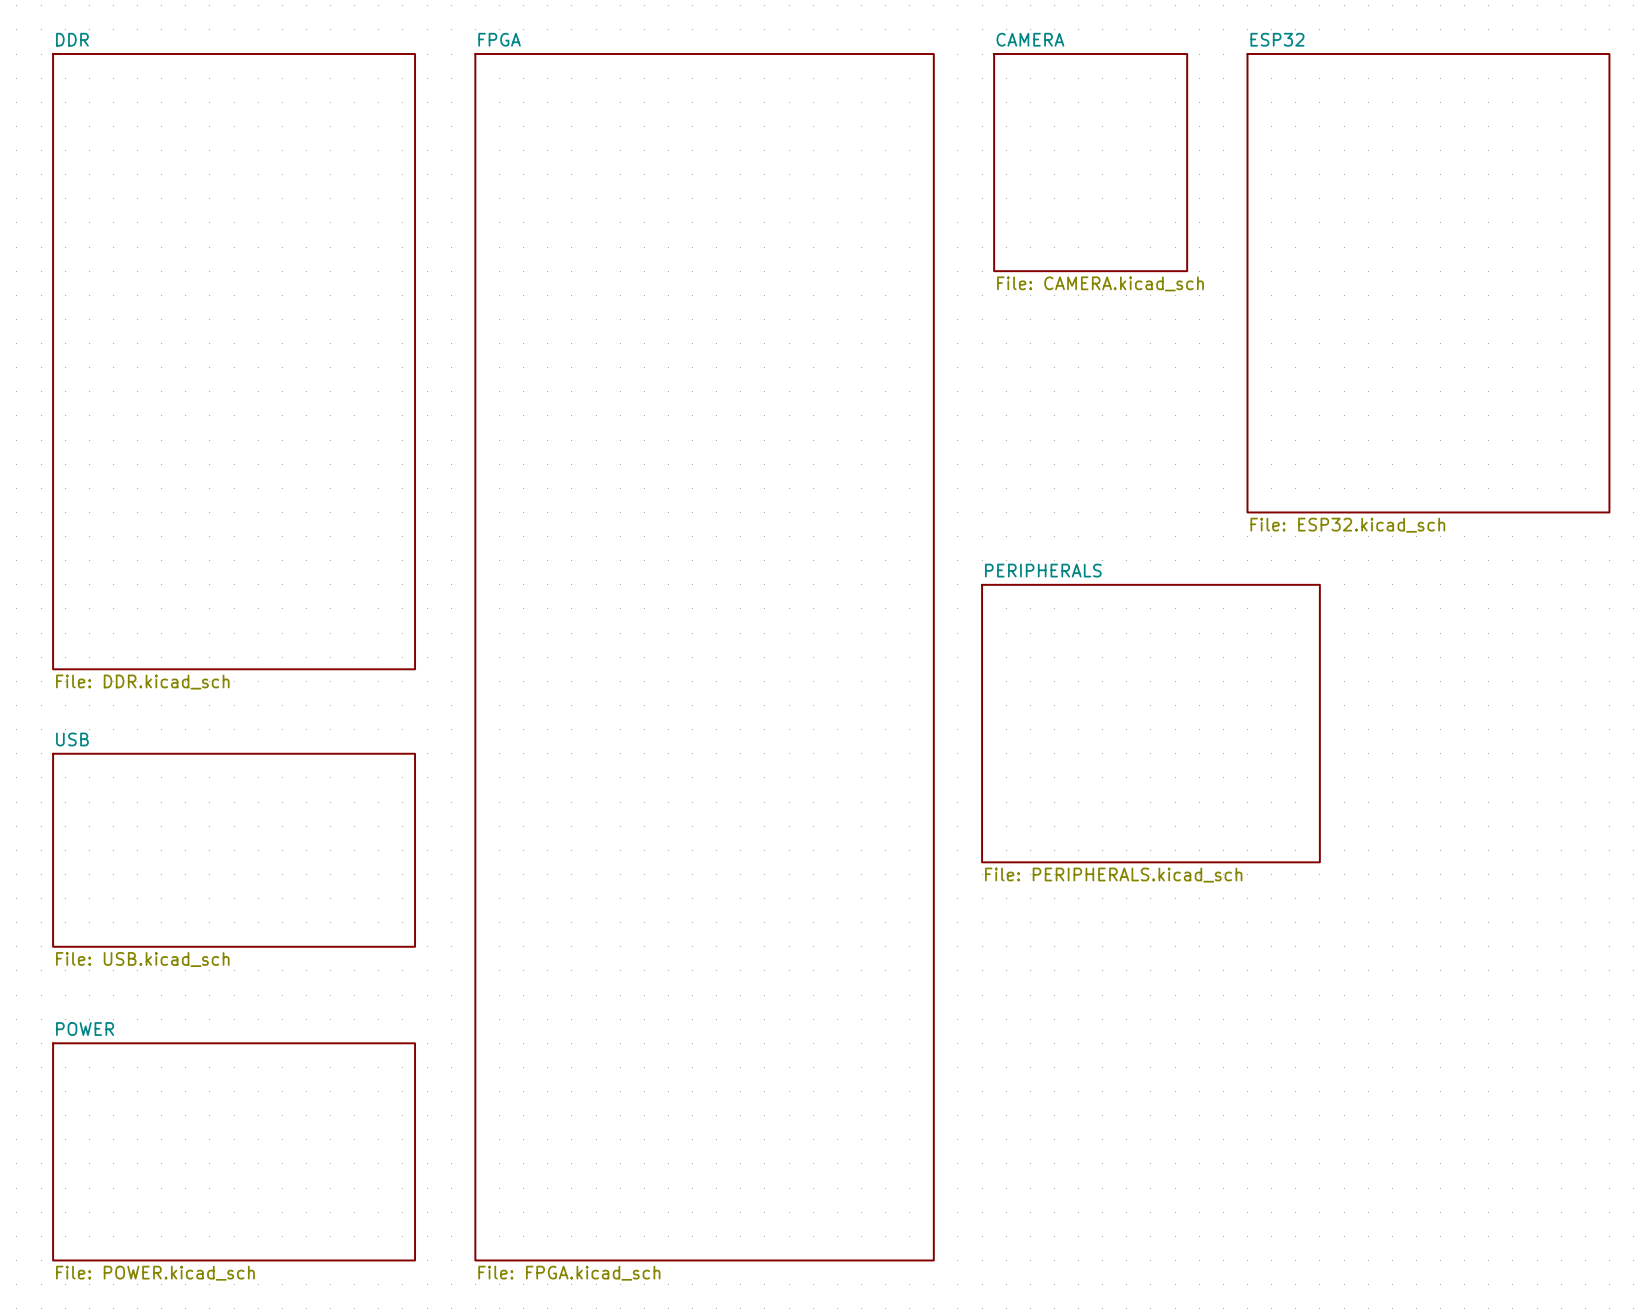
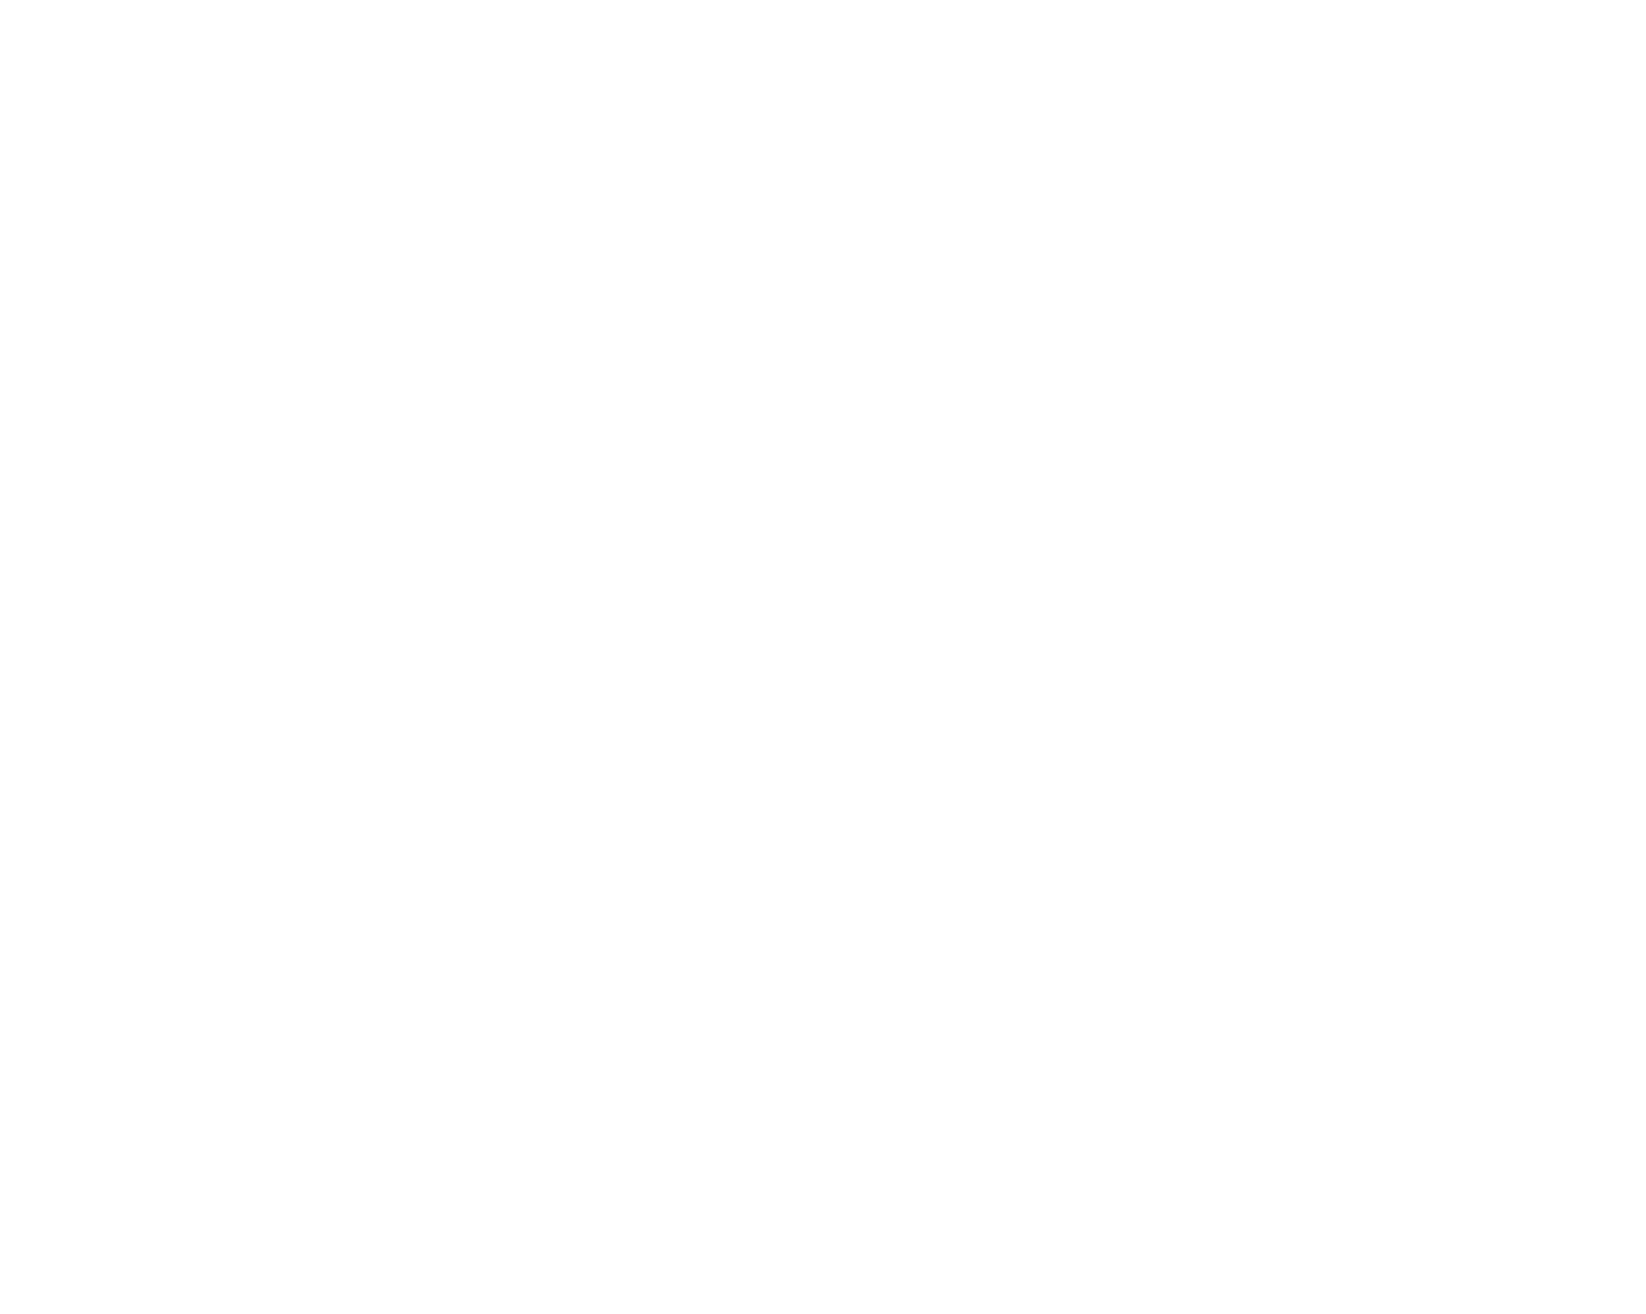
sheet CAMERA: File: CAMERA.kicad_sch (1090, 162) -> none
sheet ESP32: File: ESP32.kicad_sch (1428, 283) -> none
sheet DDR: File: DDR.kicad_sch (234, 361) -> none
sheet FPGA: File: FPGA.kicad_sch (704, 657) -> none
sheet PERIPHERALS: File: PERIPHERALS.kicad_sch (1150, 723) -> none
sheet USB: File: USB.kicad_sch (234, 850) -> none
sheet POWER: File: POWER.kicad_sch (234, 1151) -> none

